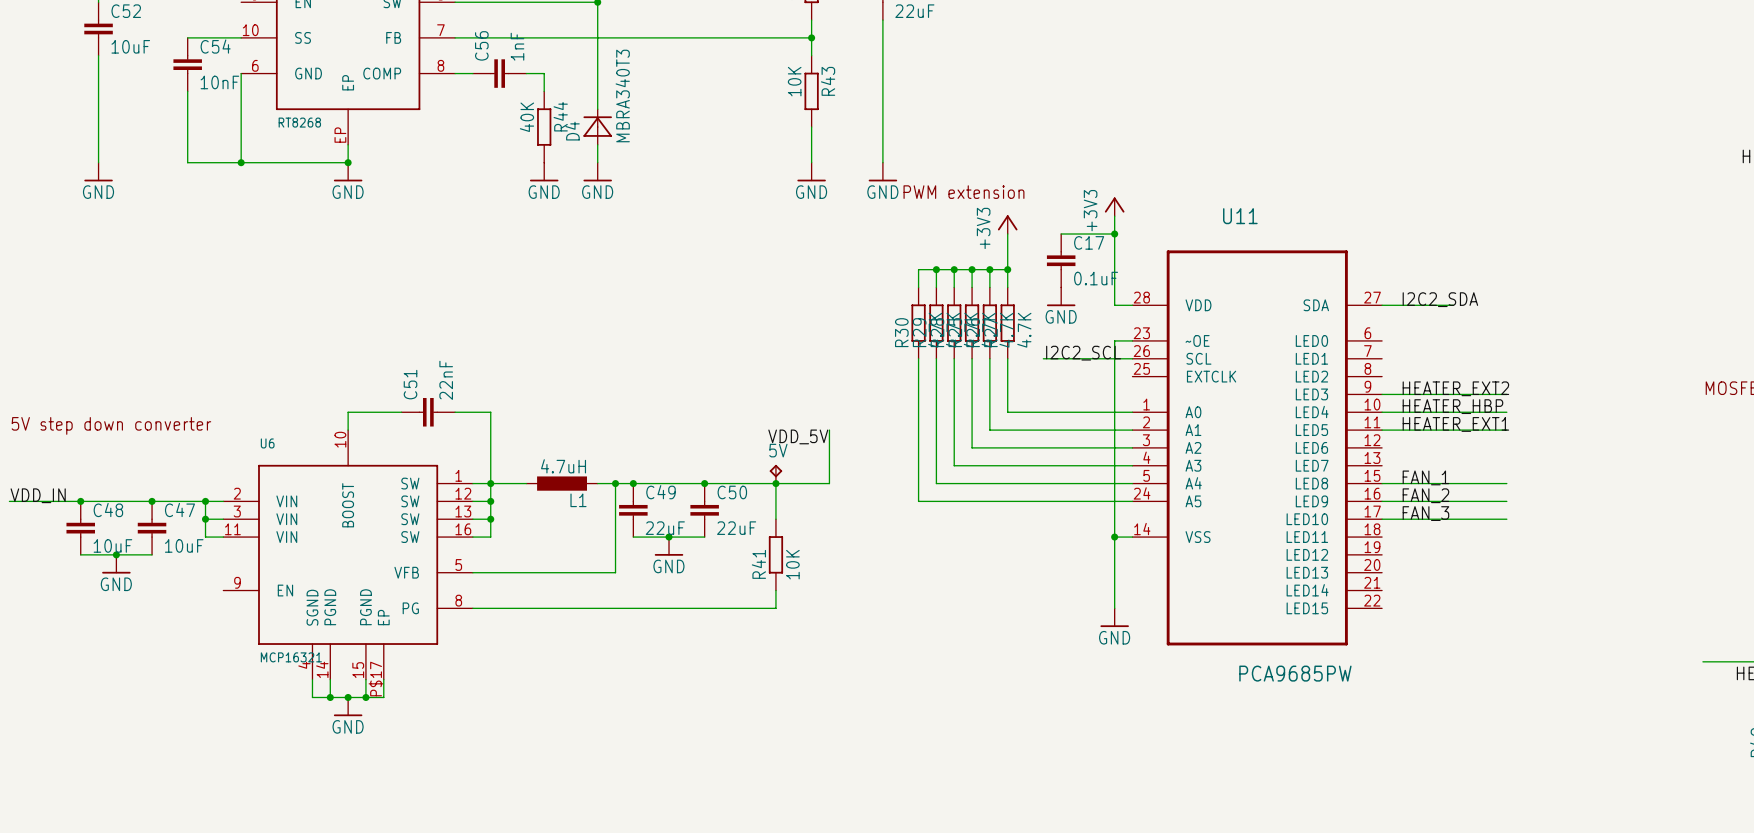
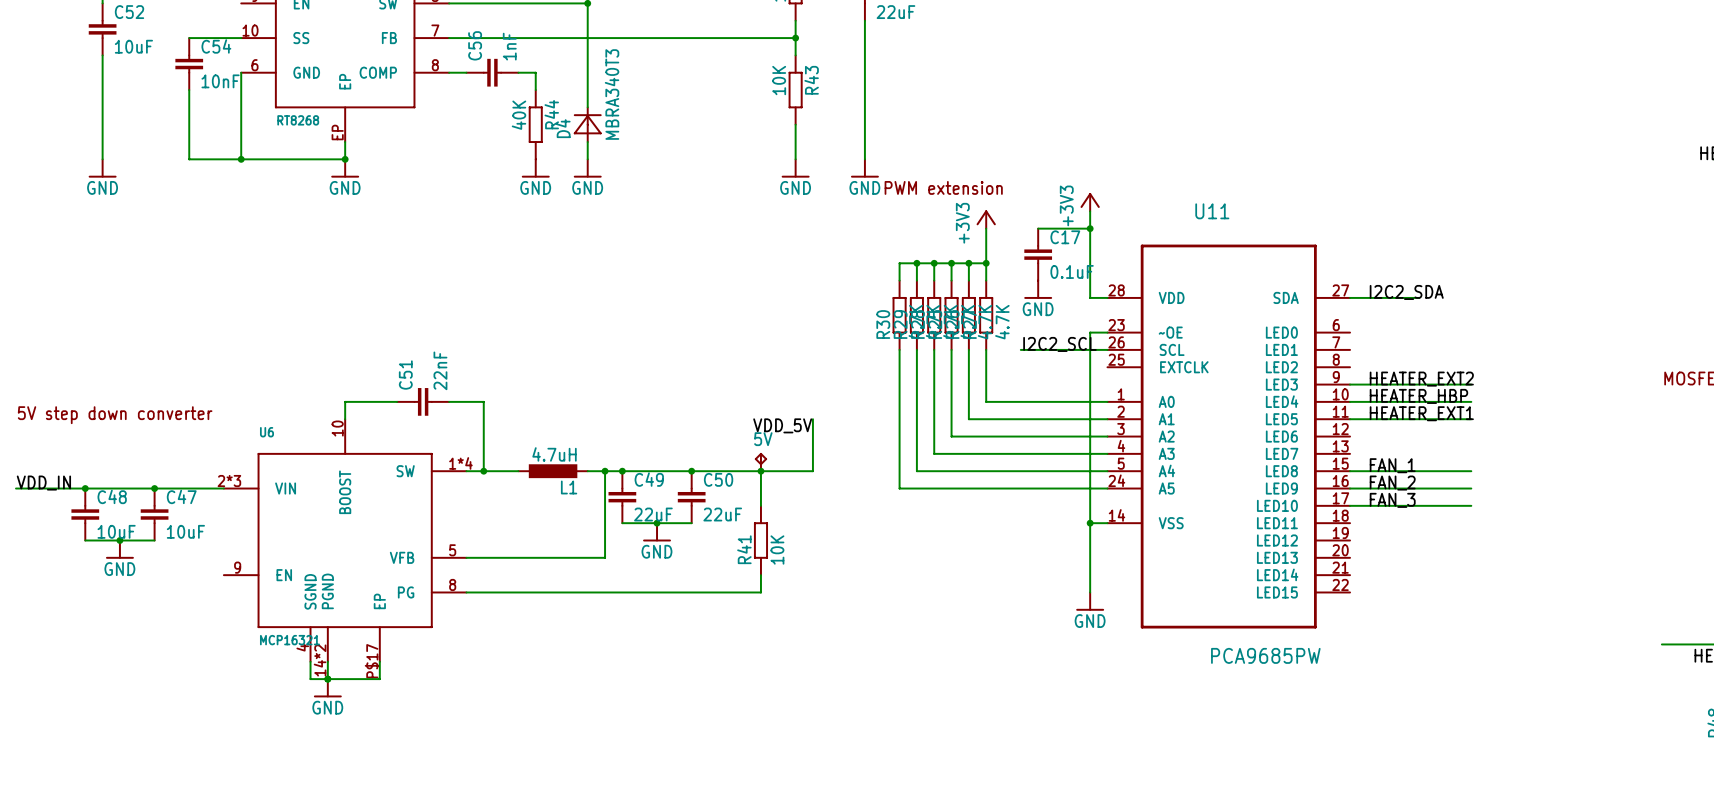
U6 symbol: [223, 430, 473, 680] -> [223, 419, 467, 662]
wire: (490, 483) (490, 537) (472, 537) -> none
wire: (205, 501) (205, 537) (223, 537) -> none
junction: (205, 501) -> none
wire: (472, 501) (490, 501) -> none
junction: (490, 501) -> none
wire: (205, 519) (223, 519) -> none
junction: (205, 519) -> none
wire: (472, 519) (490, 519) -> none
junction: (490, 519) -> none
wire: (365, 679) (365, 697) -> none
junction: (348, 697) -> none
junction: (365, 697) -> none
power symbol position: GND (348, 706) -> GND (327, 688)

